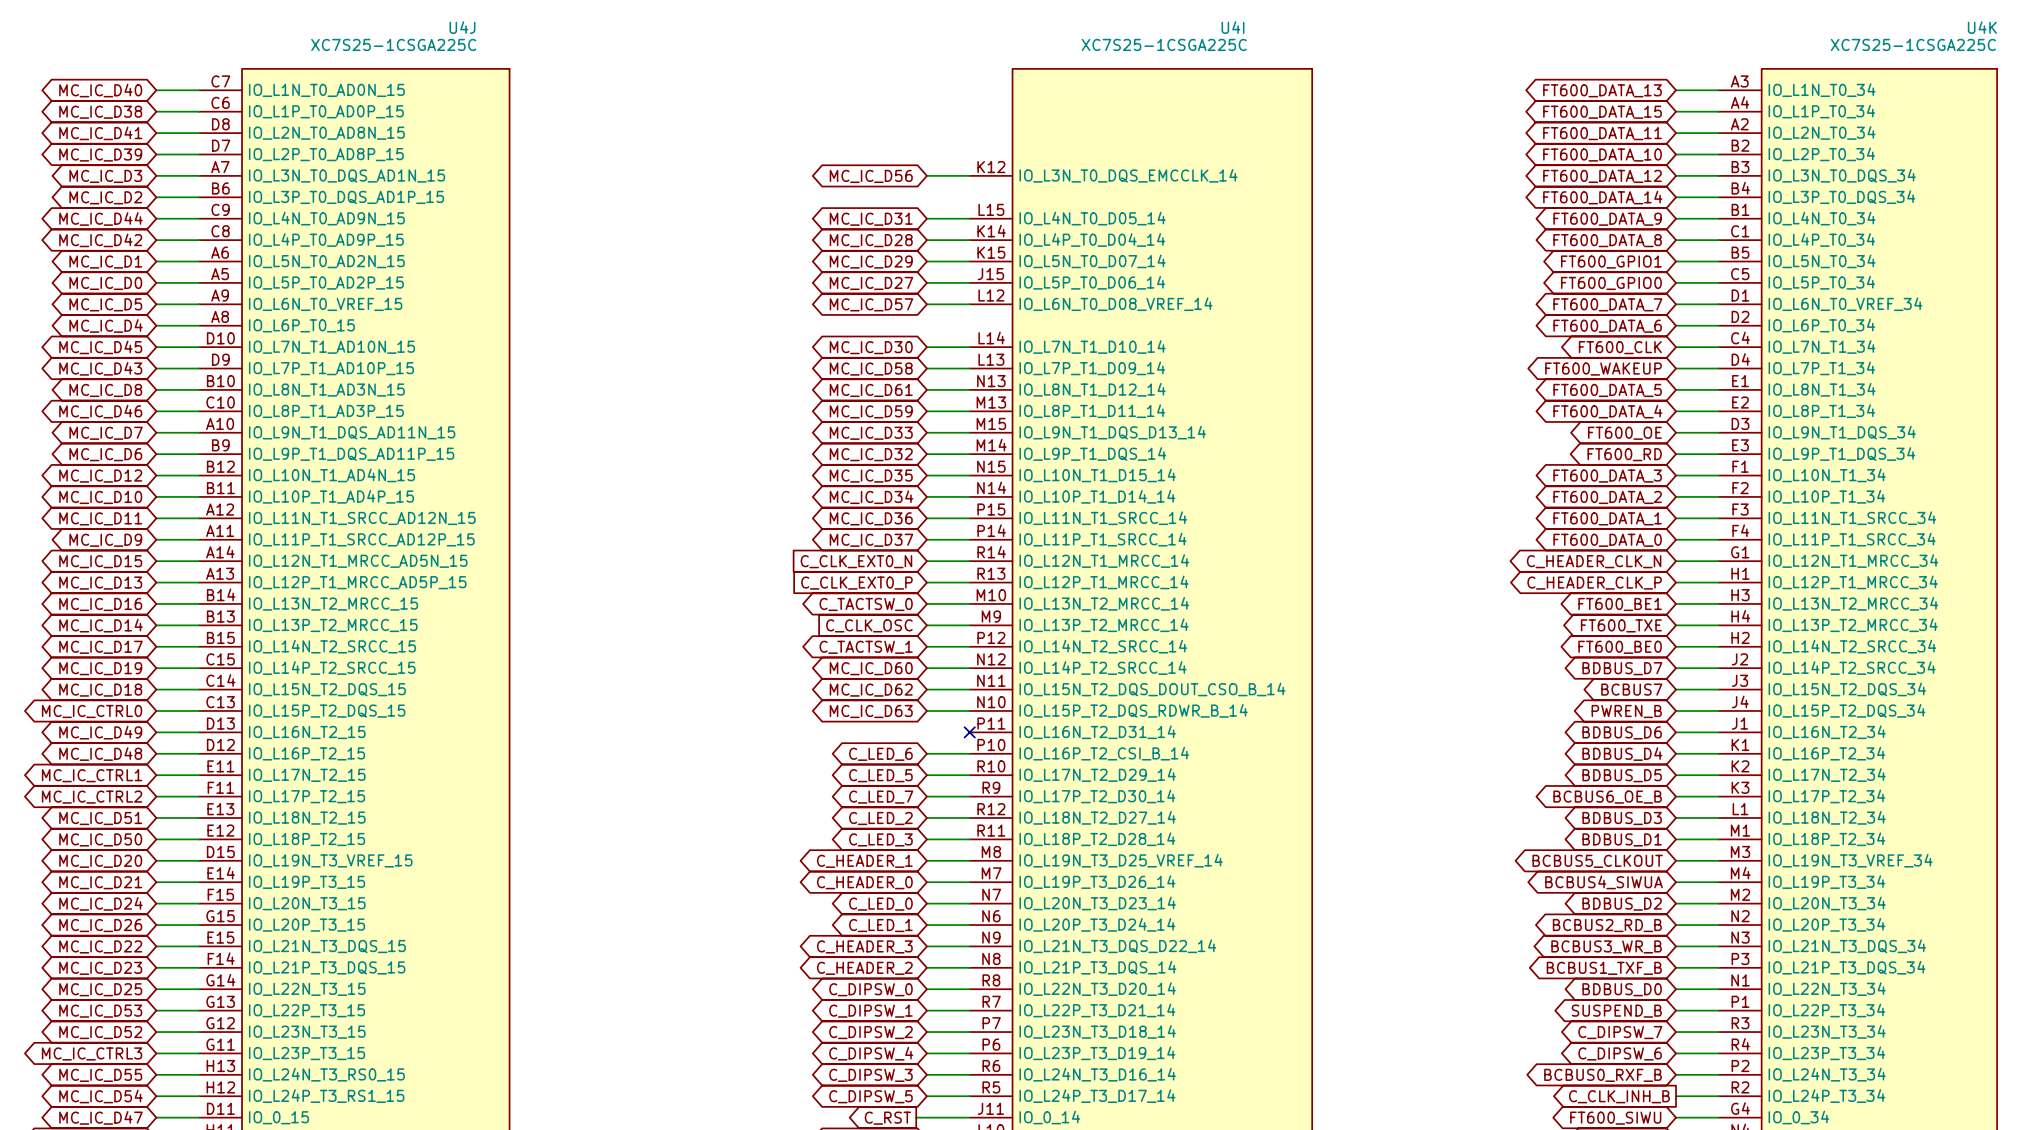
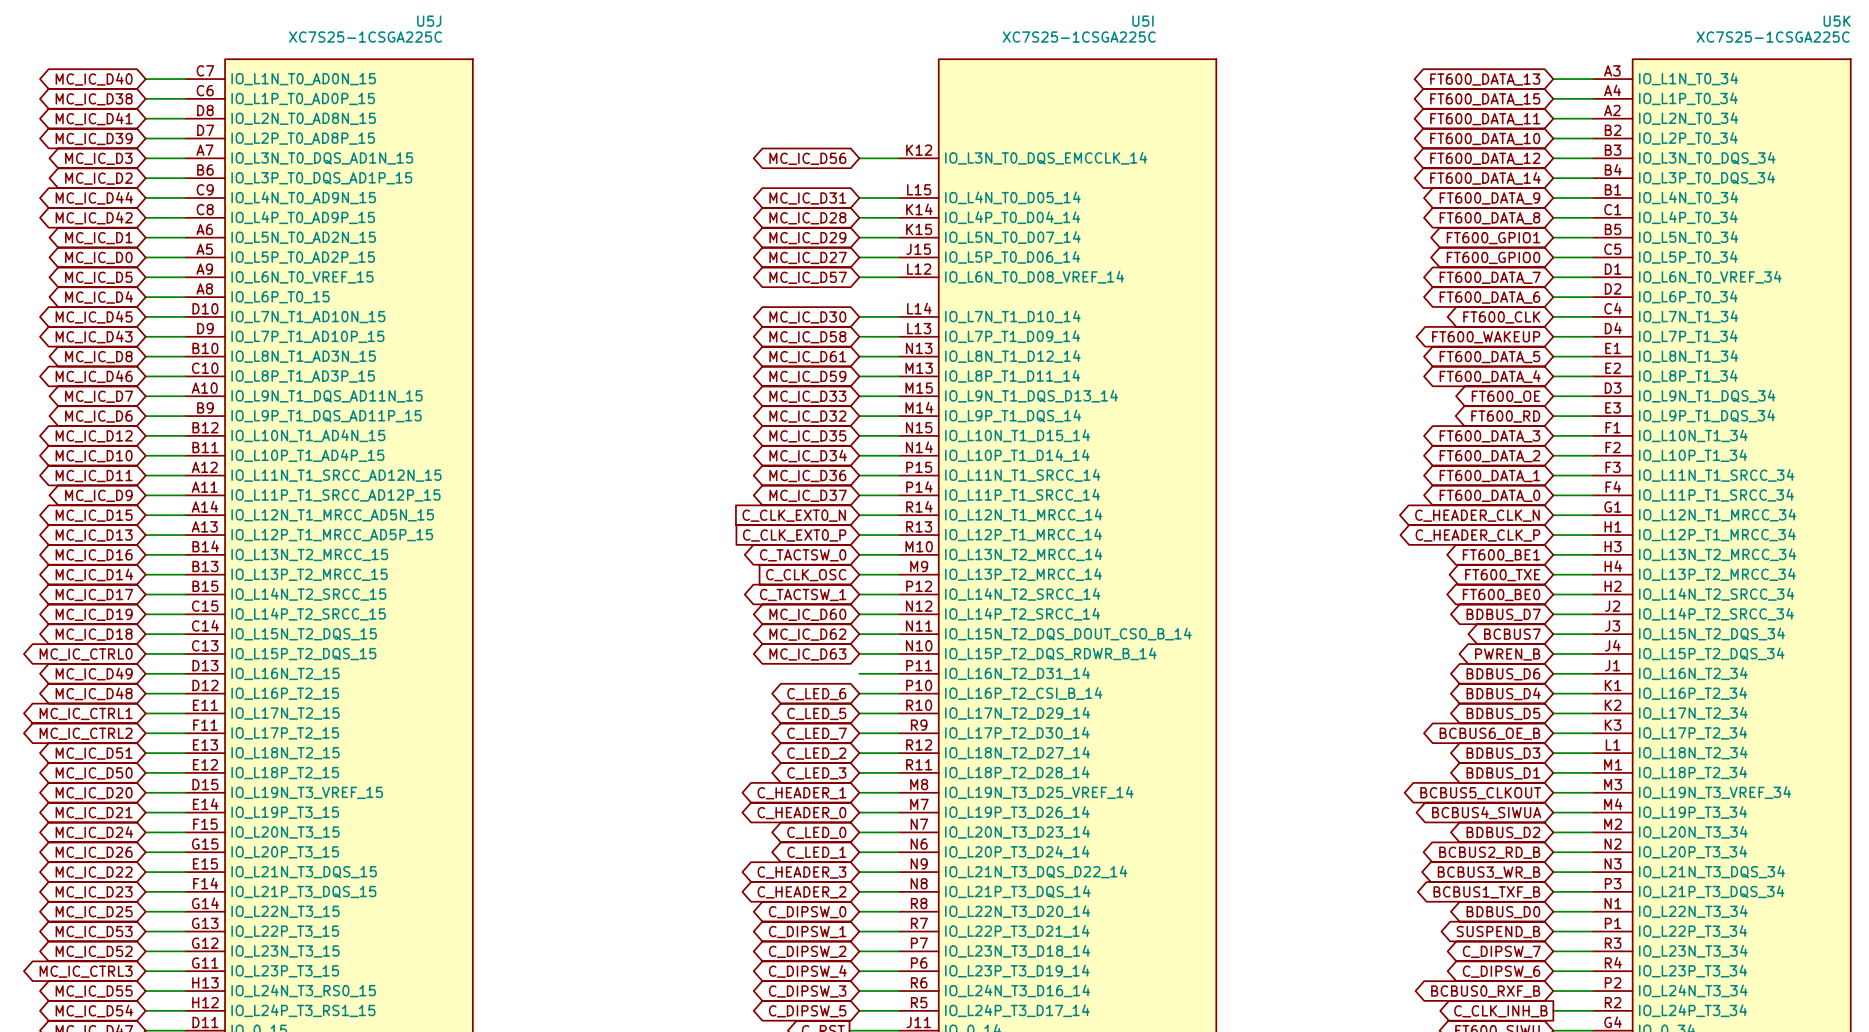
U4J name: U4J (462, 27) -> U5J (429, 21)
U4I name: U4I (1232, 27) -> U5I (1142, 21)
U4K name: U4K (1982, 27) -> U5K (1837, 21)
wire: none -> (859, 673) (899, 673)
no-connect mark: (969, 732) -> none

